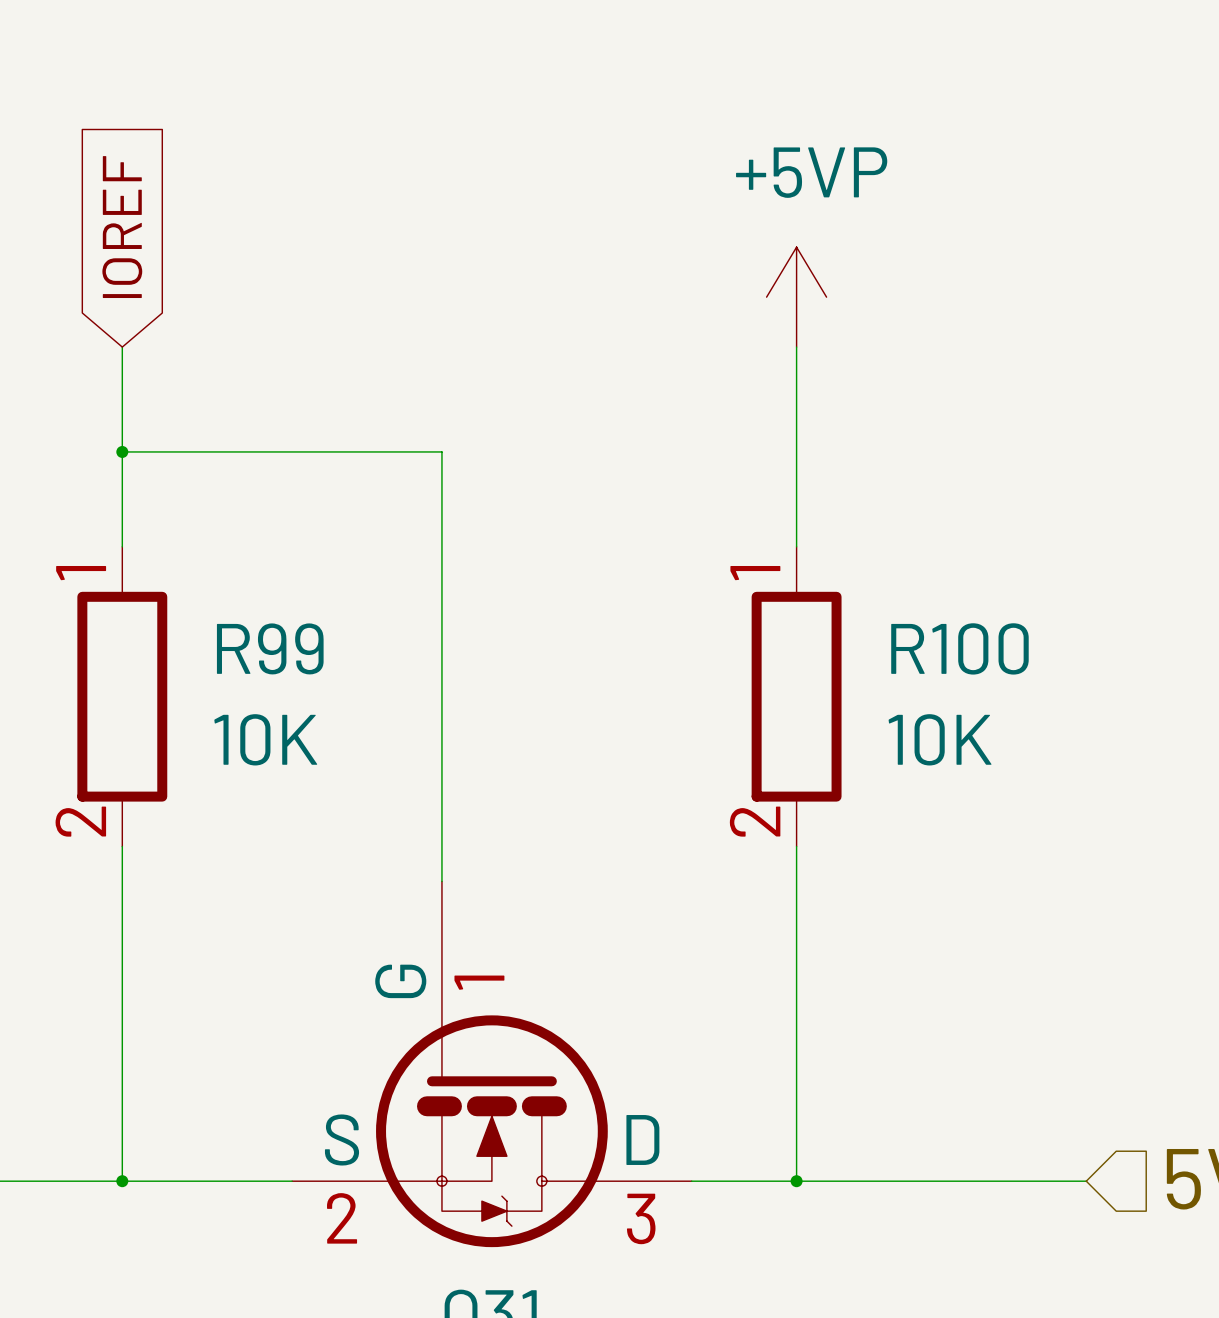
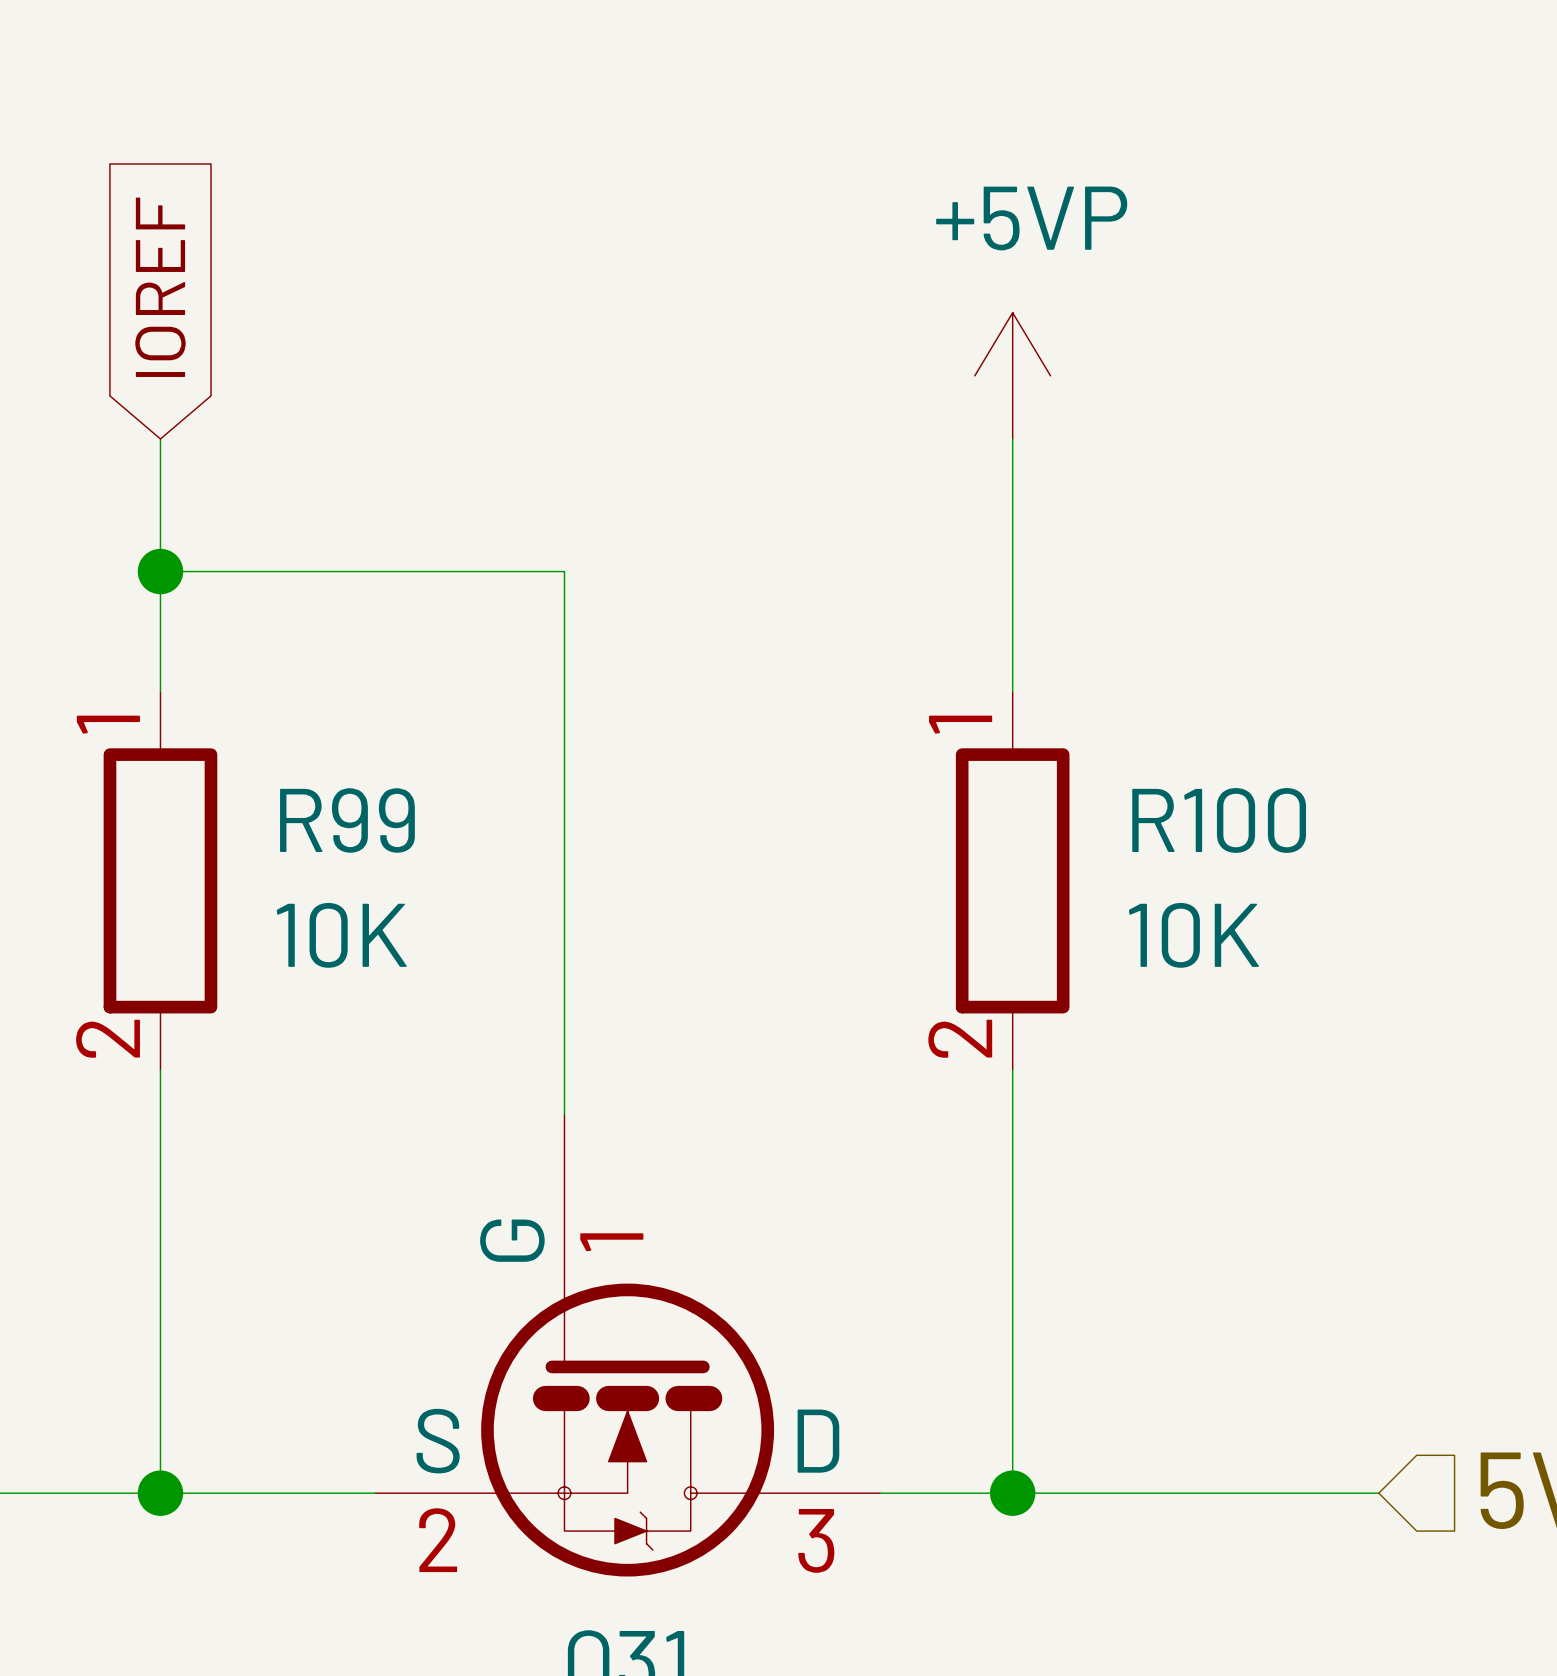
junction size: [116, 445, 129, 458] -> [137, 548, 184, 595]
junction size: [116, 1175, 129, 1188] -> [137, 1470, 184, 1516]
junction size: [790, 1175, 803, 1188] -> [989, 1470, 1036, 1516]

